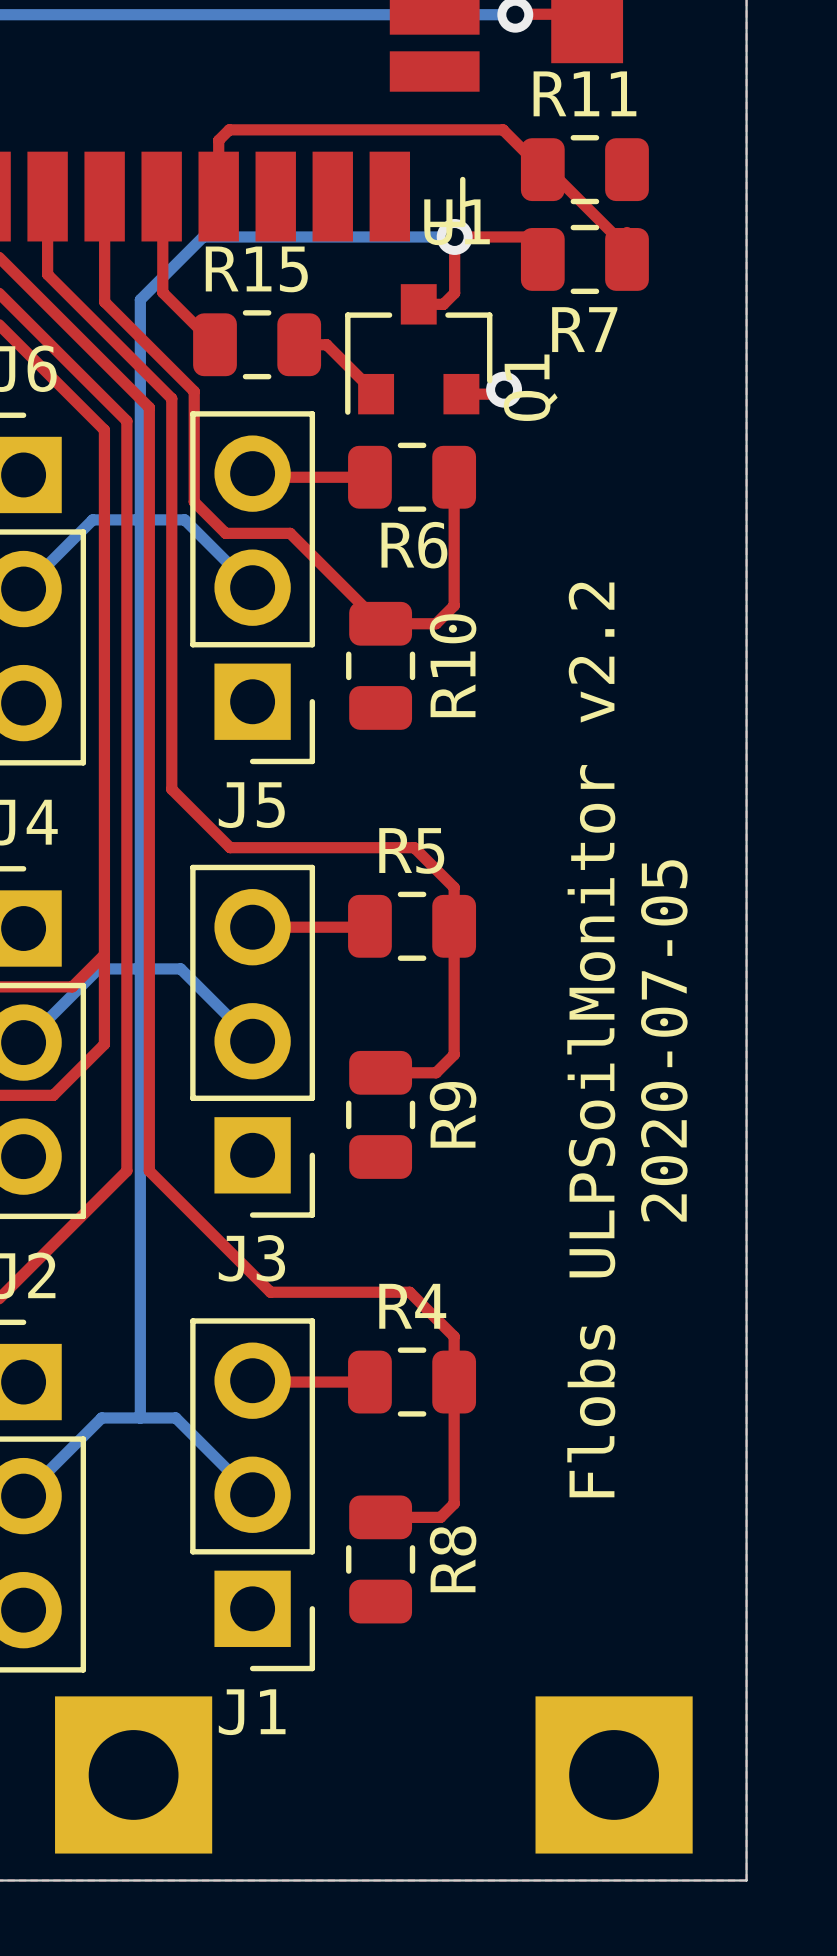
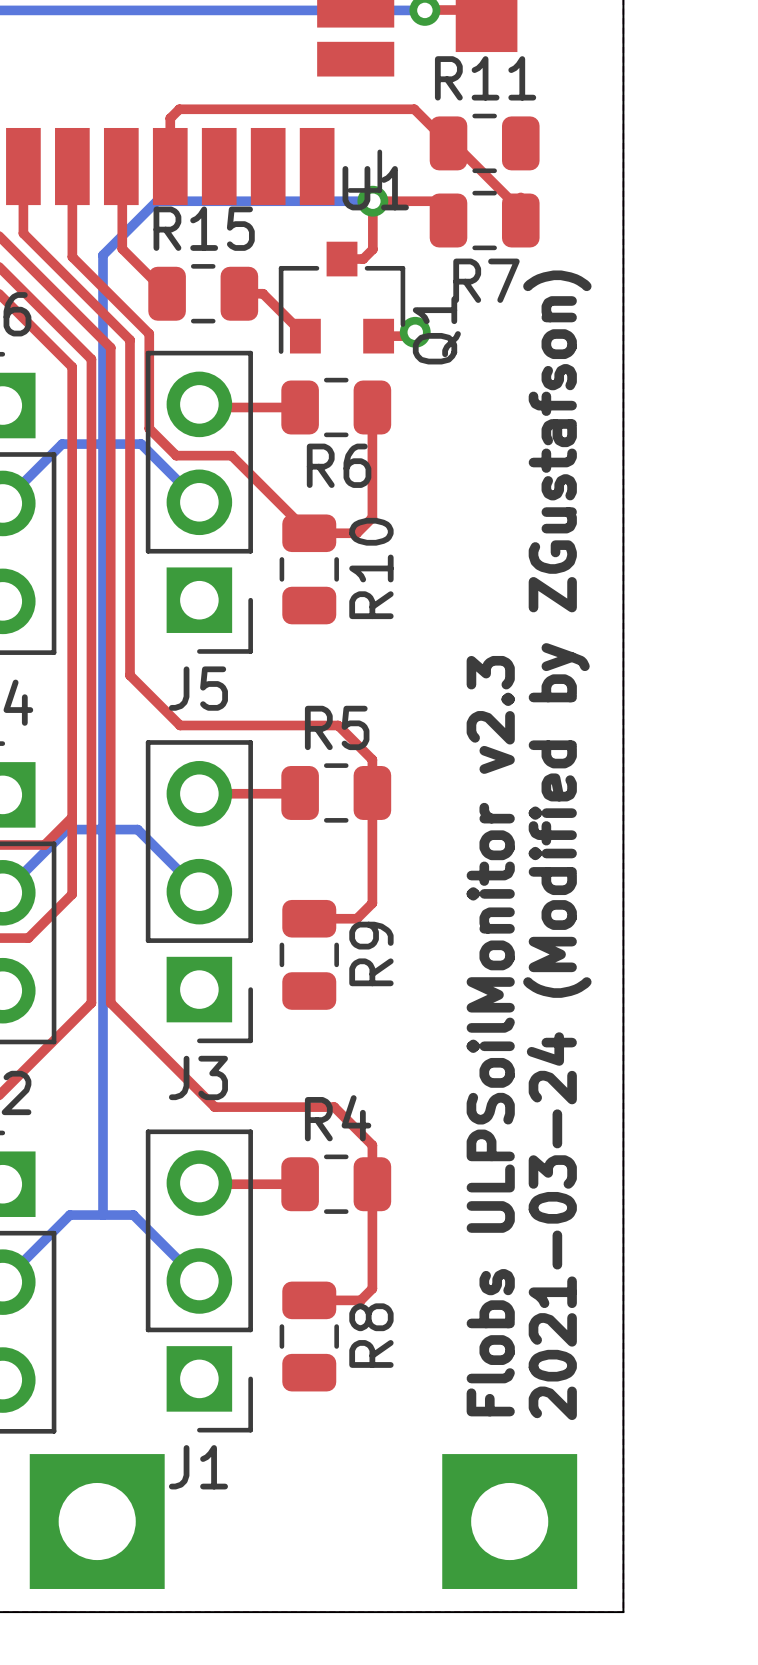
text: none -> 2021-03-24 (Modified by ZGustafson) (557, 845)
text: Flobs ULPSoilMonitor v2.2 (591, 1039) -> Flobs ULPSoilMonitor v2.3 (490, 1036)
text: 2020-07-05 (664, 1040) -> none

